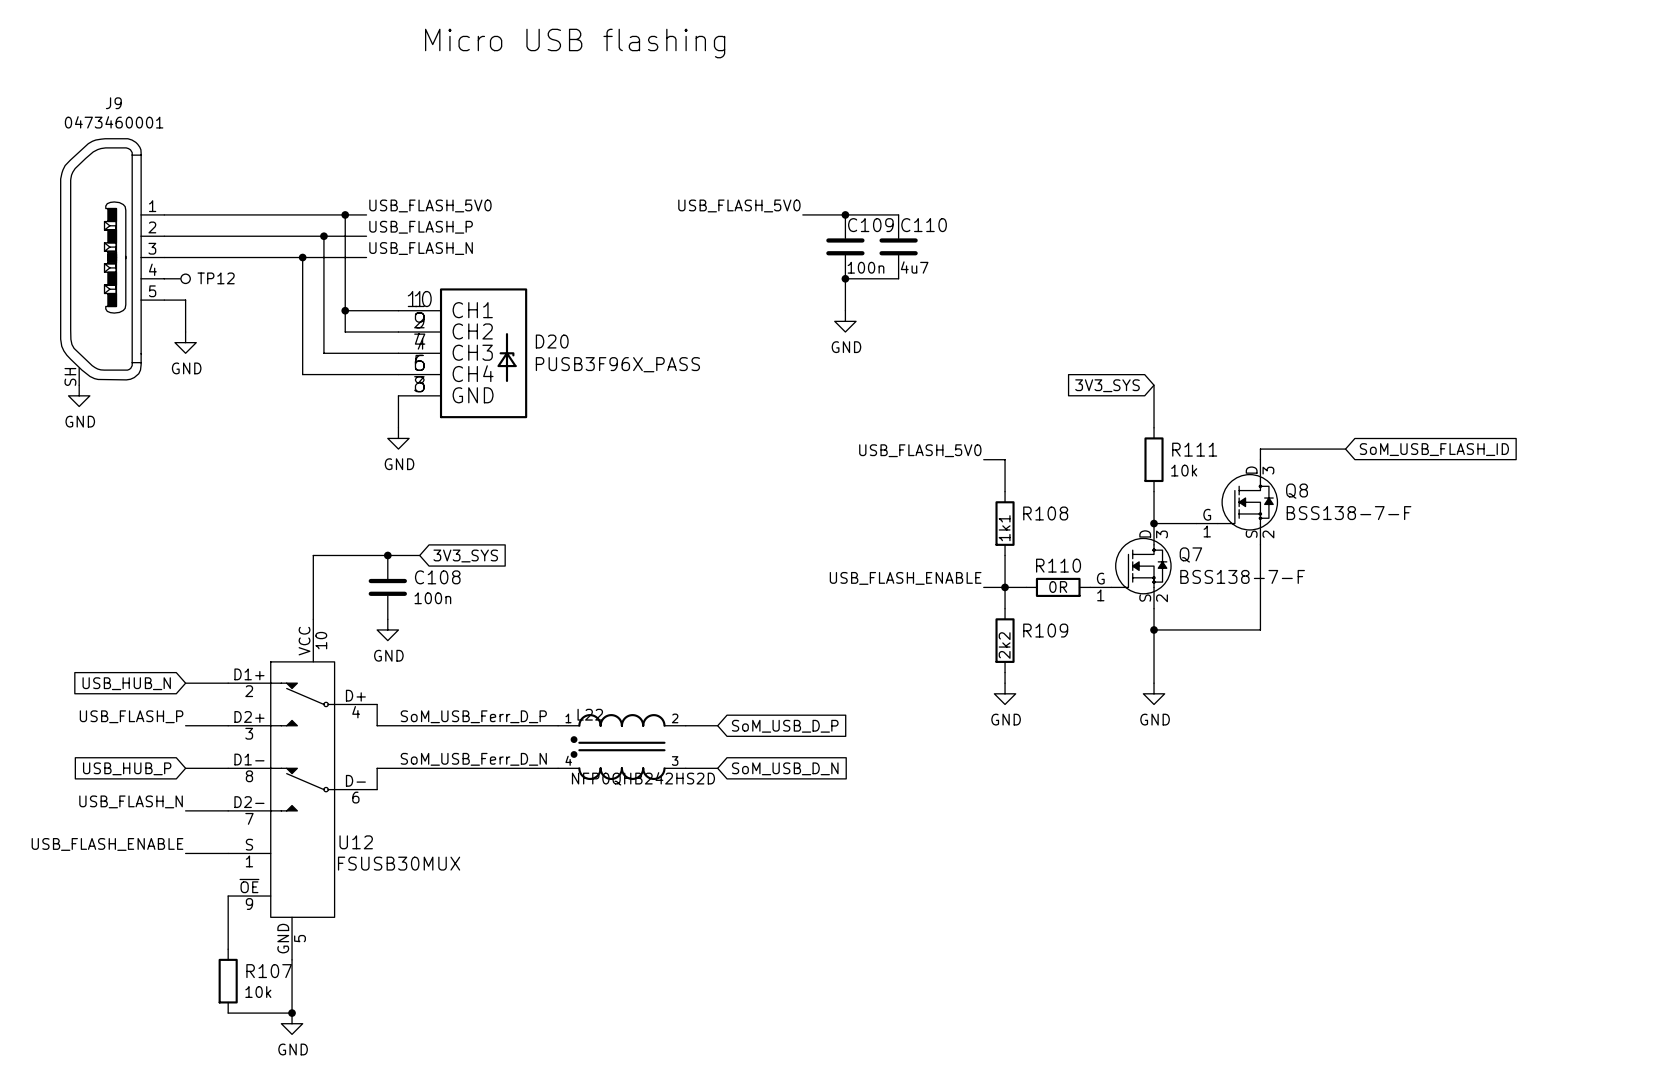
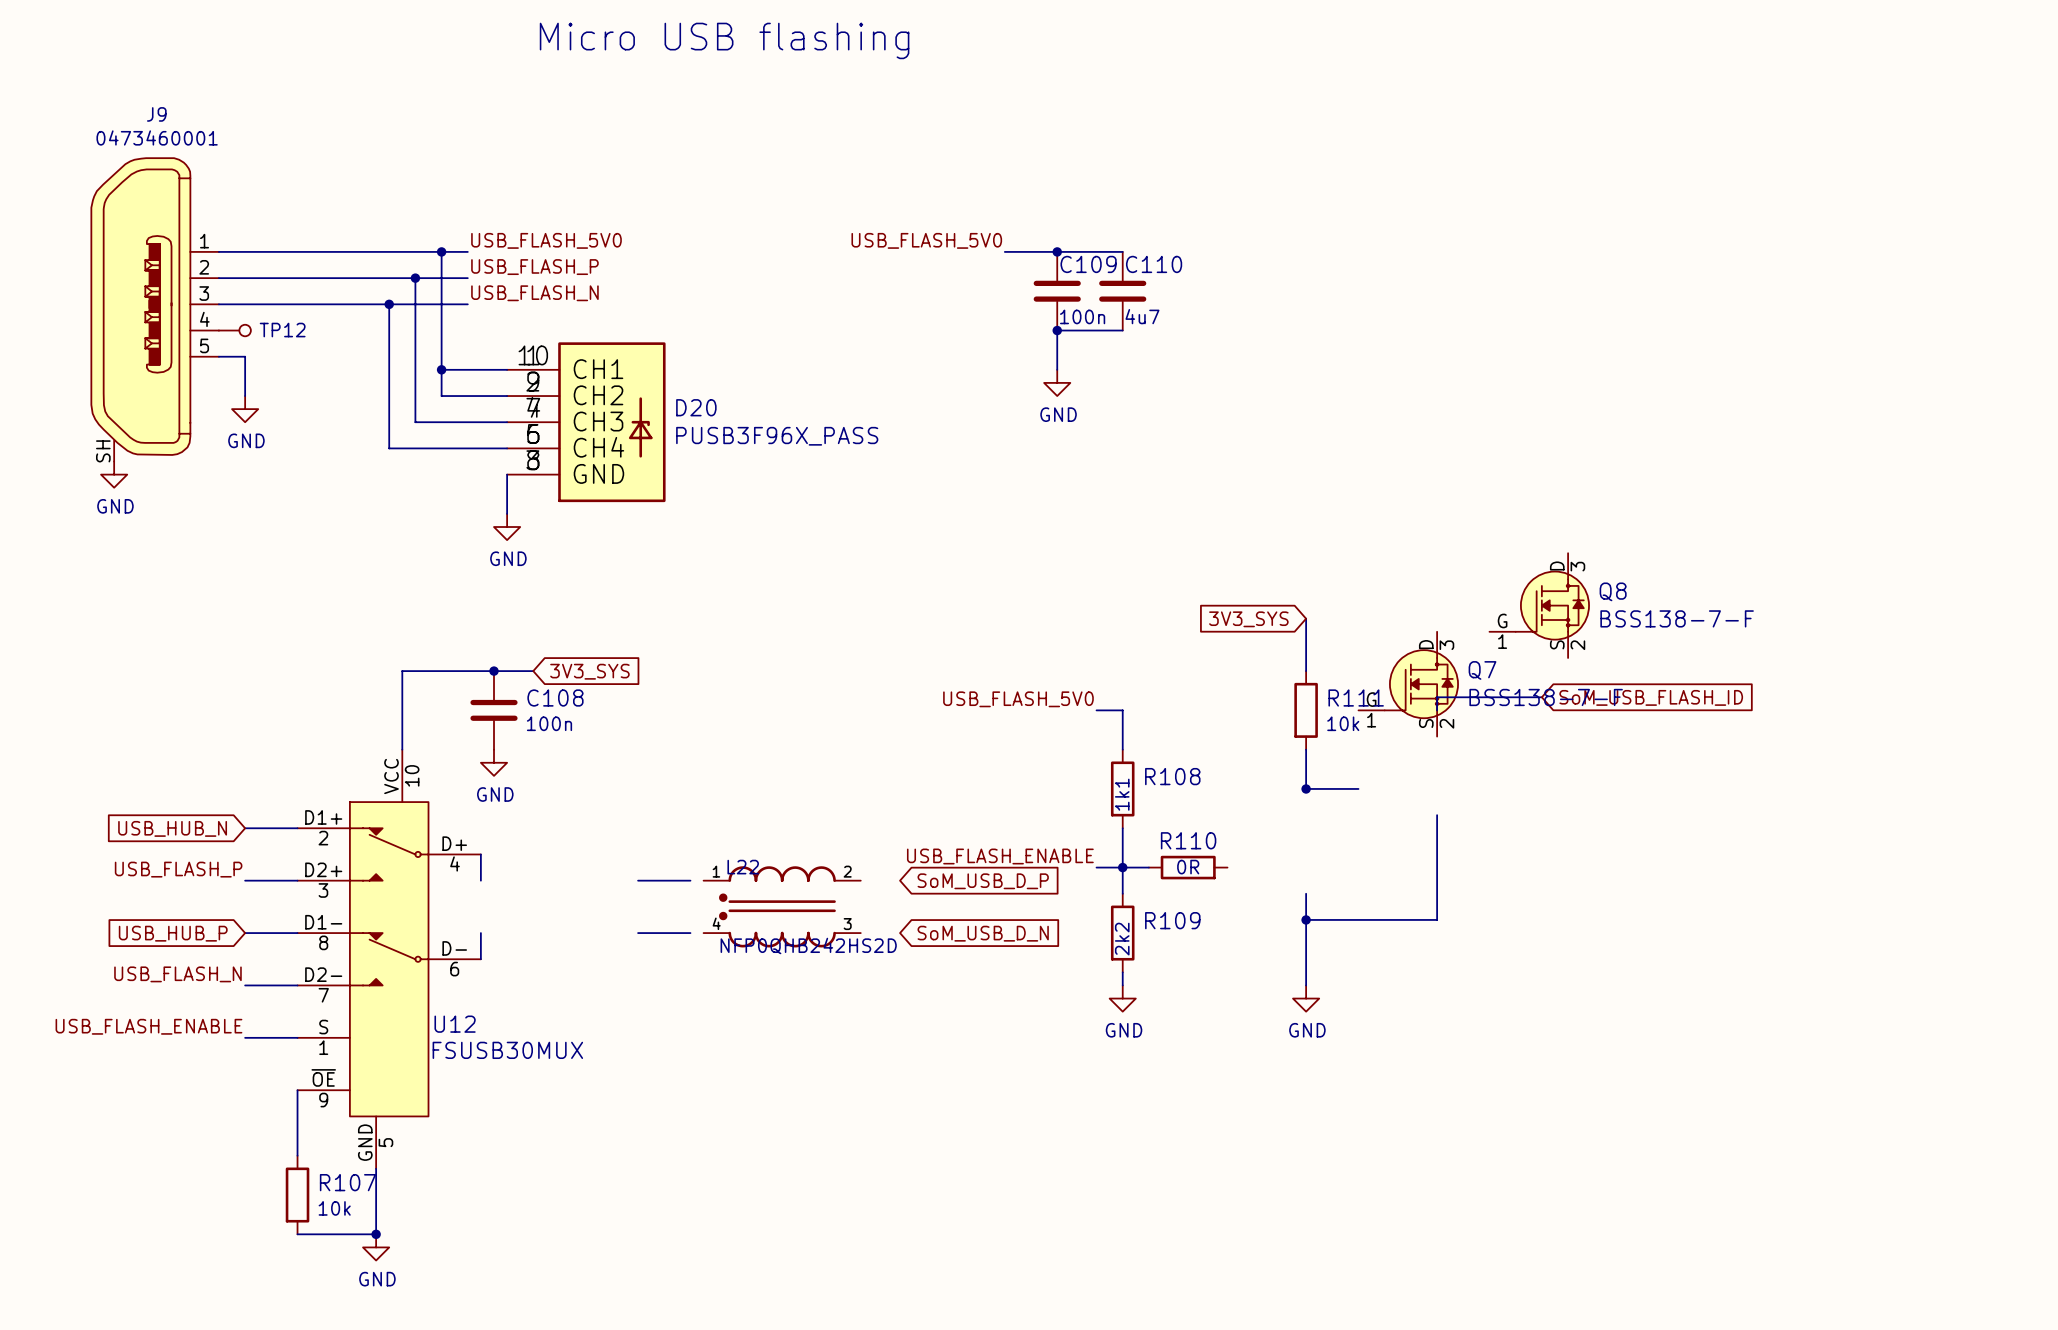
global label position: 3V3_SYS (1107, 385) -> 3V3_SYS (1248, 619)
wire: (1154, 385) (1154, 427) -> (1306, 618) (1306, 671)
wire: (1345, 449) (1260, 449) (1260, 459) -> (1541, 697) (1437, 697) (1437, 710)
global label position: SoM_USB_FLASH_ID (1434, 449) -> SoM_USB_FLASH_ID (1651, 697)
label position: USB_FLASH_5V0 (920, 450) -> USB_FLASH_5V0 (1018, 699)
wire: (983, 459) (1005, 459) (1005, 491) -> (1096, 710) (1122, 710) (1122, 749)
R111 position: (1154, 459) -> (1306, 710)
wire: (1154, 491) (1154, 523) (1196, 523) -> (1306, 749) (1306, 788) (1358, 788)
R108 position: (1005, 523) -> (1122, 788)
junction: (1154, 523) -> none
wire: (1260, 544) (1260, 629) (1154, 629) -> none
wire: (1005, 555) (1005, 608) -> (1122, 828) (1122, 893)
label position: USB_FLASH_ENABLE (905, 578) -> USB_FLASH_ENABLE (1000, 856)
wire: (983, 587) (1026, 587) -> (1096, 867) (1148, 867)
junction: (1005, 587) -> none
R110 position: (1058, 587) -> (1188, 867)
wire: (1154, 608) (1154, 672) -> none
junction: (1154, 629) -> none
R109 position: (1005, 640) -> (1122, 933)
junction: none -> (1306, 788)
wire: (1005, 672) (1005, 683) -> (1122, 972) (1122, 985)
wire: none -> (1437, 828) (1437, 919) (1306, 919)
power symbol: GND (1005, 693) -> none
power symbol: GND (1154, 693) -> none
junction: none -> (1122, 867)
label: SoM_USB_Ferr_D_P (473, 716) -> none
wire: (377, 725) (504, 725) -> none
wire: (547, 725) (558, 725) -> none
wire: (685, 725) (717, 725) -> none
wire: none -> (1306, 893) (1306, 985)
junction: none -> (1306, 919)
label: SoM_USB_Ferr_D_N (473, 759) -> none
wire: (377, 768) (504, 768) -> none
wire: (547, 768) (558, 768) -> none
wire: (685, 768) (717, 768) -> none
power symbol: none -> GND (1122, 998)
power symbol: none -> GND (1306, 998)

